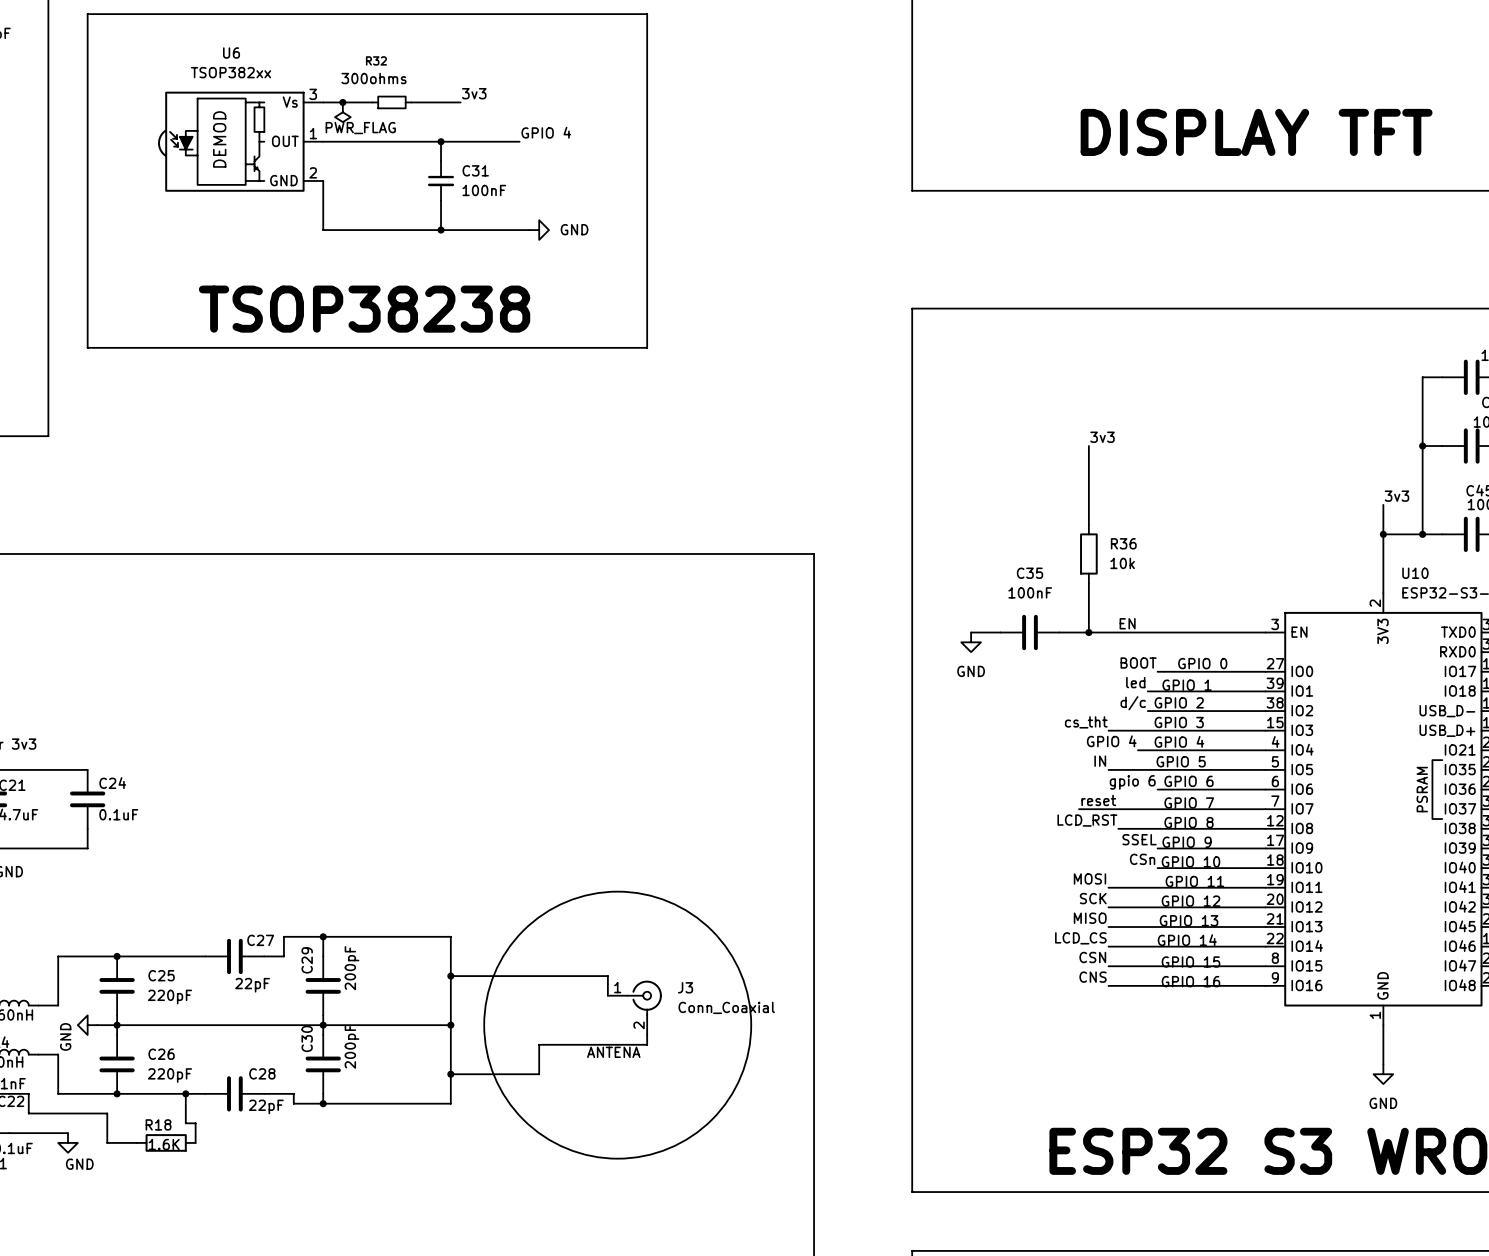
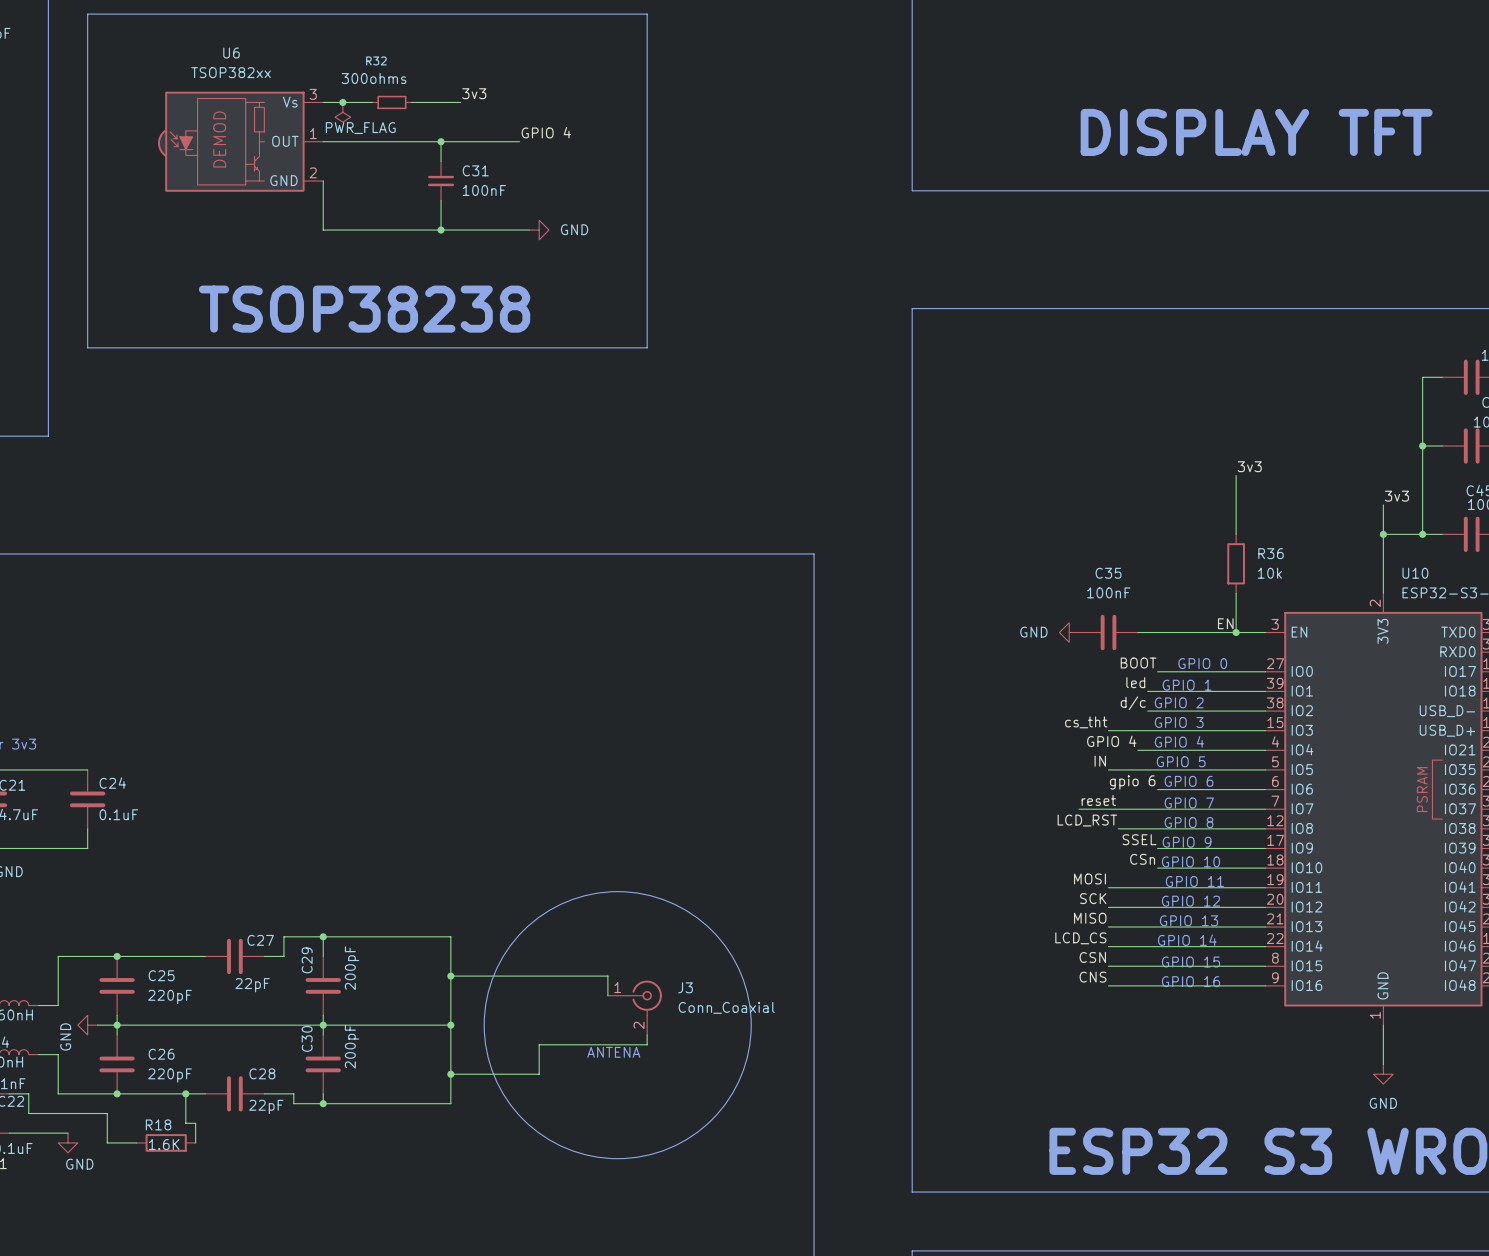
label position: 3v3 (1102, 437) -> 3v3 (1249, 466)
wire: (1088, 446) (1088, 524) -> none
wire: none -> (1236, 475) (1236, 534)
R36 position: (1088, 553) -> (1236, 563)
wire: (1088, 583) (1088, 632) -> none
wire: none -> (1236, 593) (1236, 632)
label position: EN (1127, 623) -> EN (1225, 623)
wire: (971, 632) (1000, 632) -> none
C35 position: (1029, 632) -> (1108, 632)
junction: (1088, 632) -> none
junction: none -> (1236, 632)
power symbol rotation: 0° (971, 642) -> 90° clockwise (1069, 632)
power symbol position: GND (971, 642) -> GND (1069, 632)

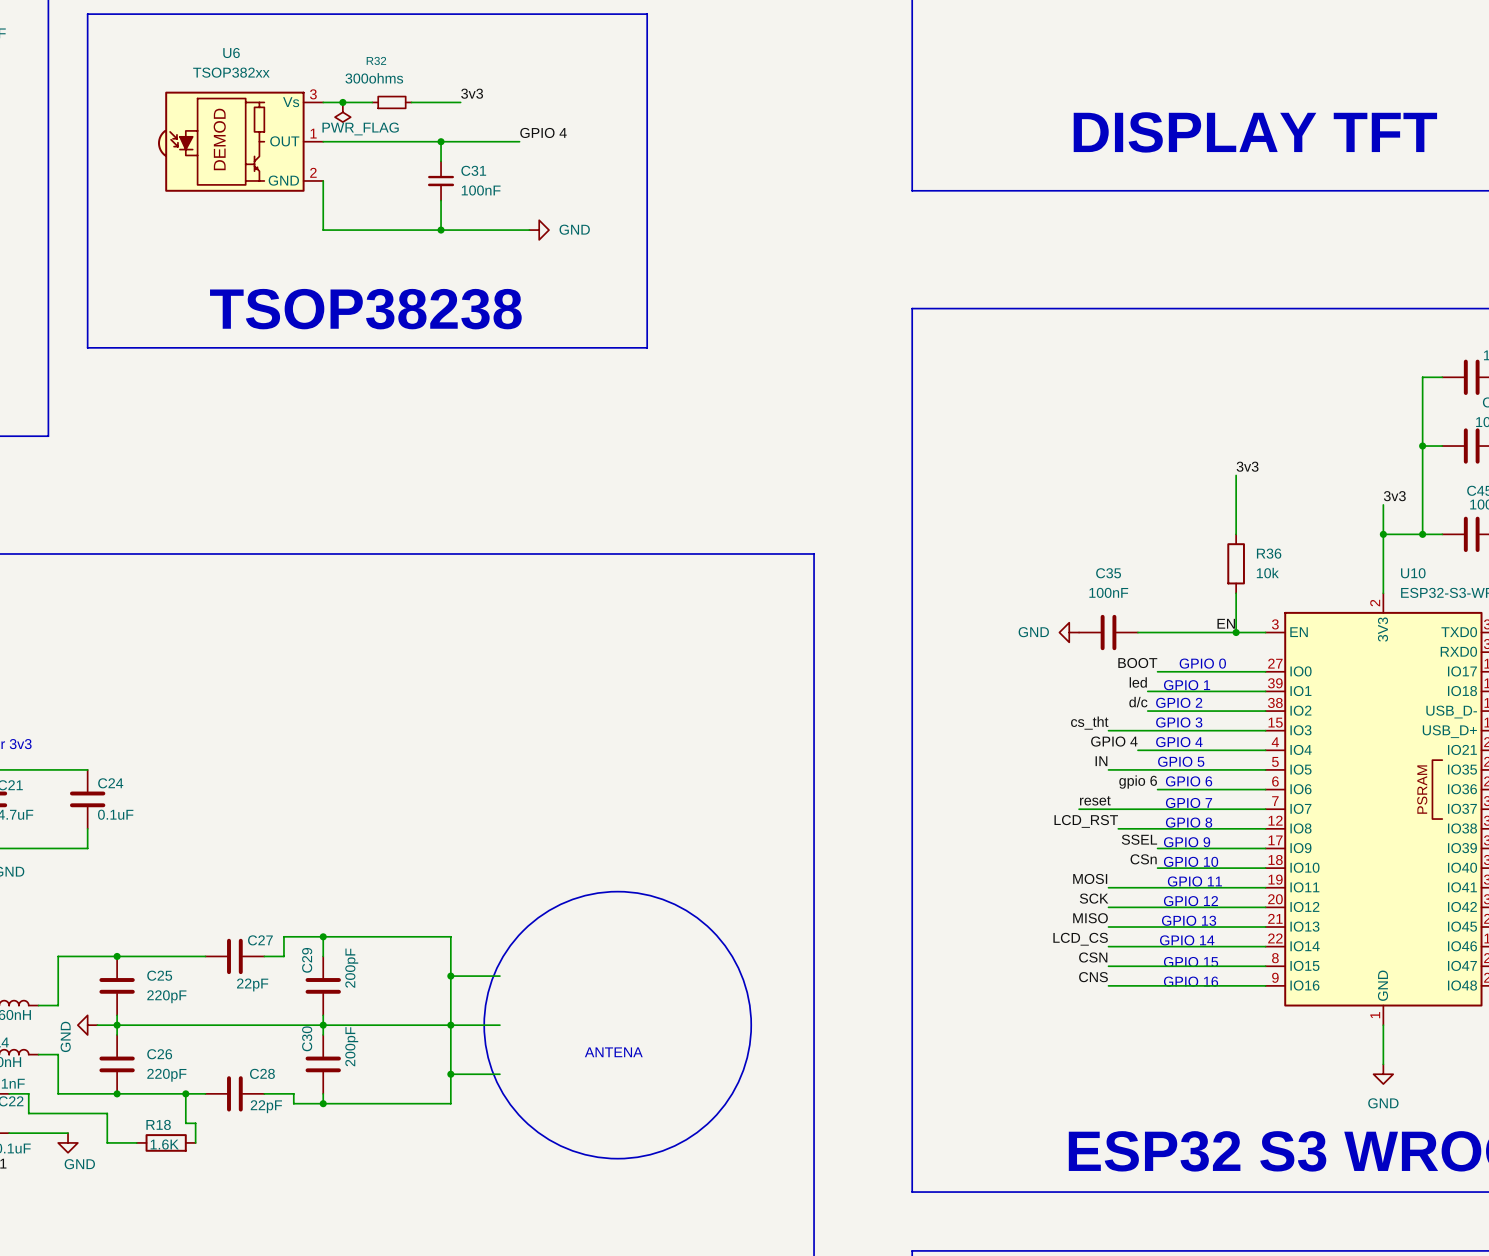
wire: (499, 976) (607, 976) (607, 995) -> none
J3: Conn_Coaxial (634, 1007) -> none
wire: none -> (450, 1025) (499, 1025)
wire: (647, 1034) (647, 1044) (539, 1044) (539, 1074) (499, 1074) -> none

